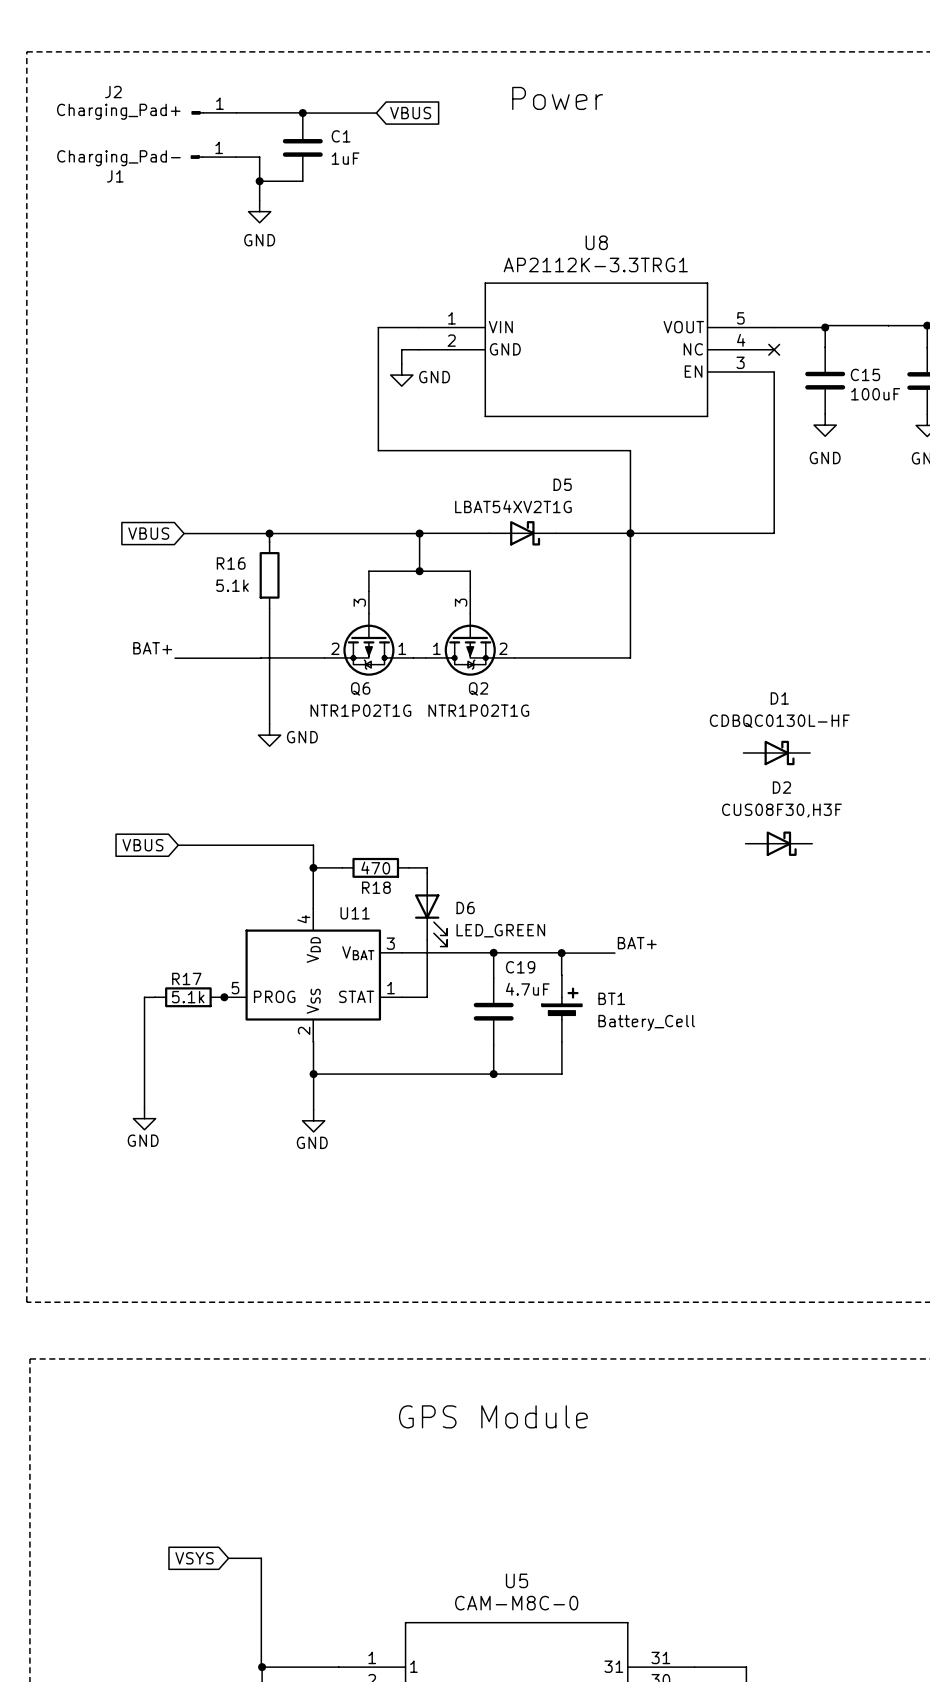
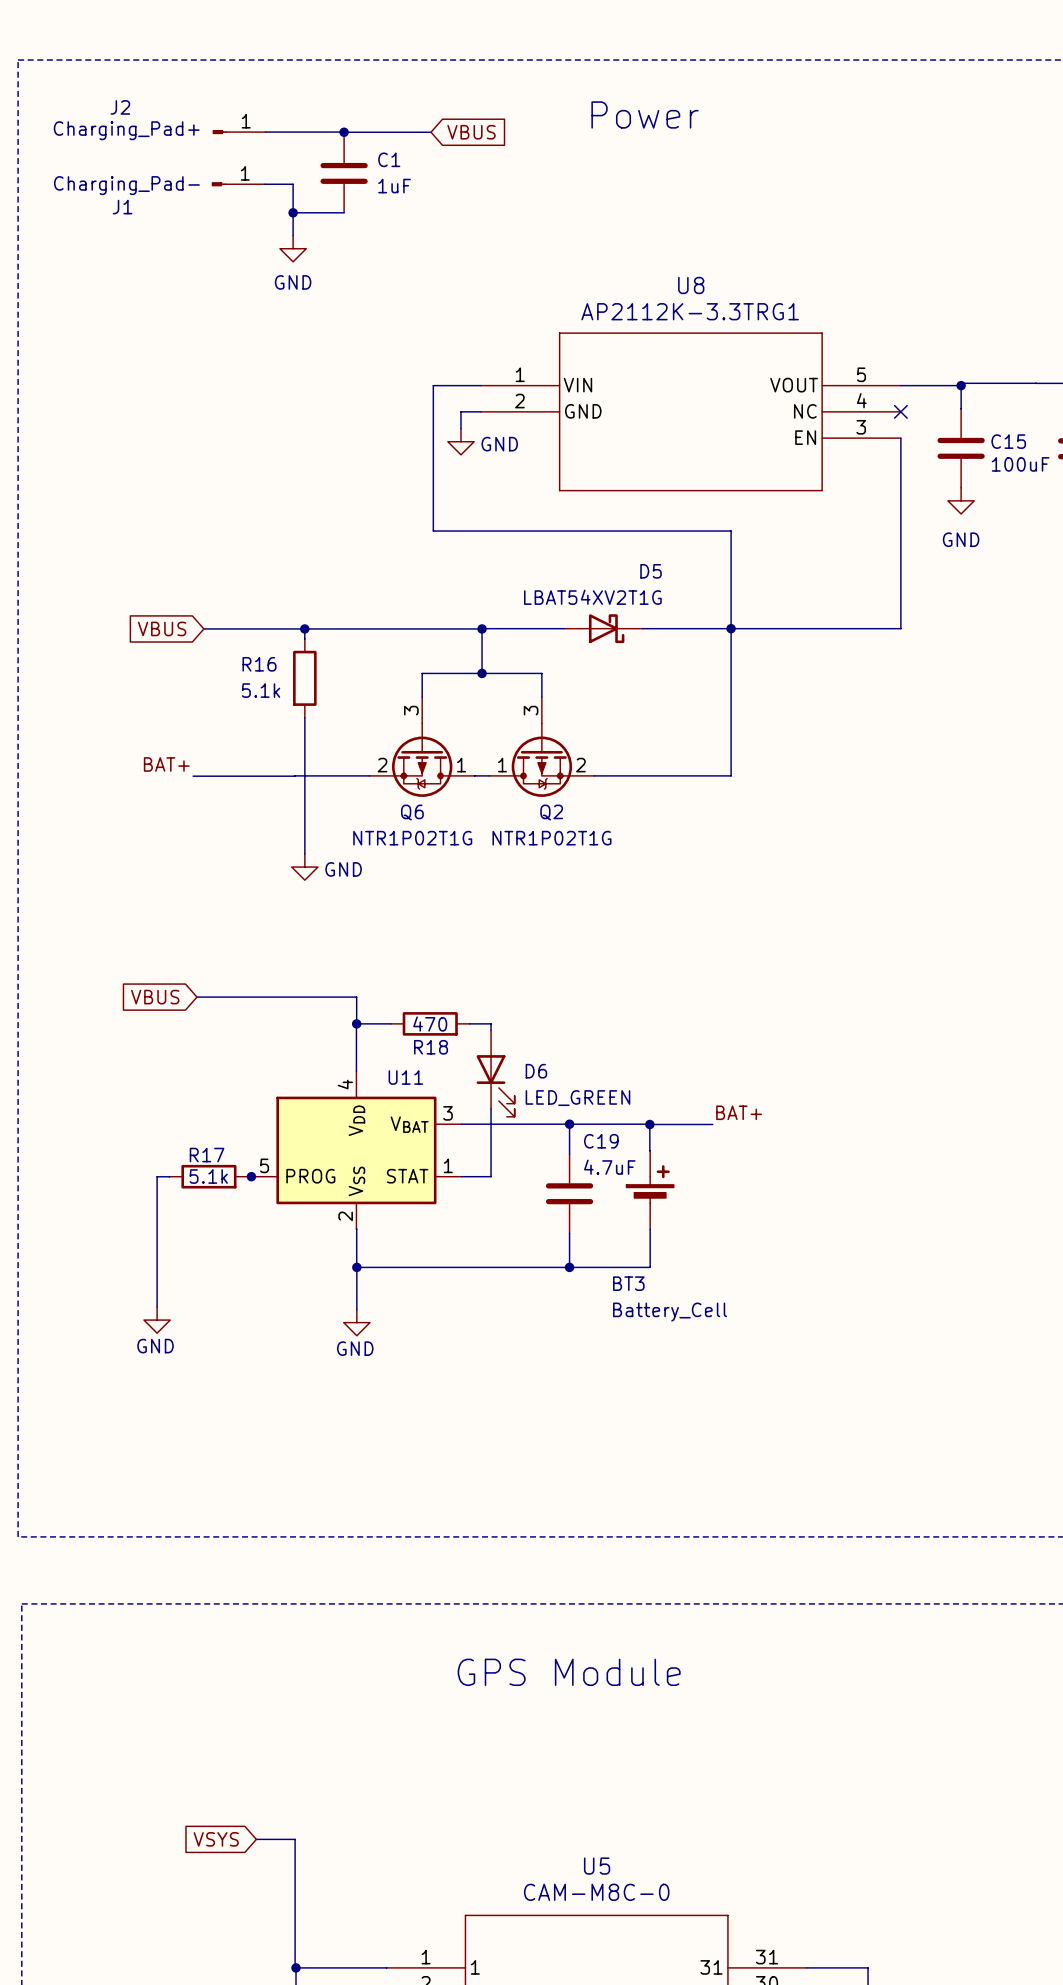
D1: CDBQC0130L-HF (776, 752) -> none
D2: CUS08F30,H3F (778, 843) -> none
BT1 name: BT1 (611, 998) -> BT3 (628, 1283)
BT1 value position: Battery_Cell (646, 1022) -> Battery_Cell (670, 1312)

